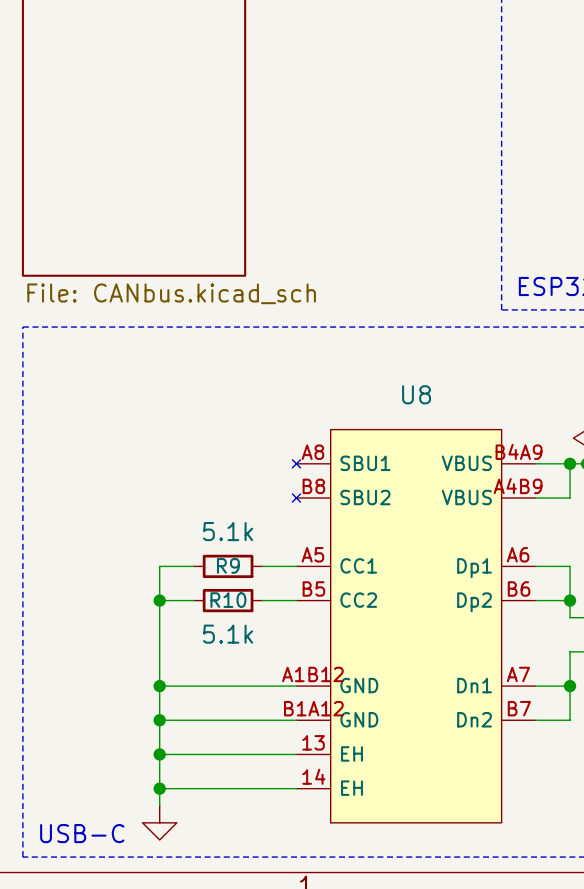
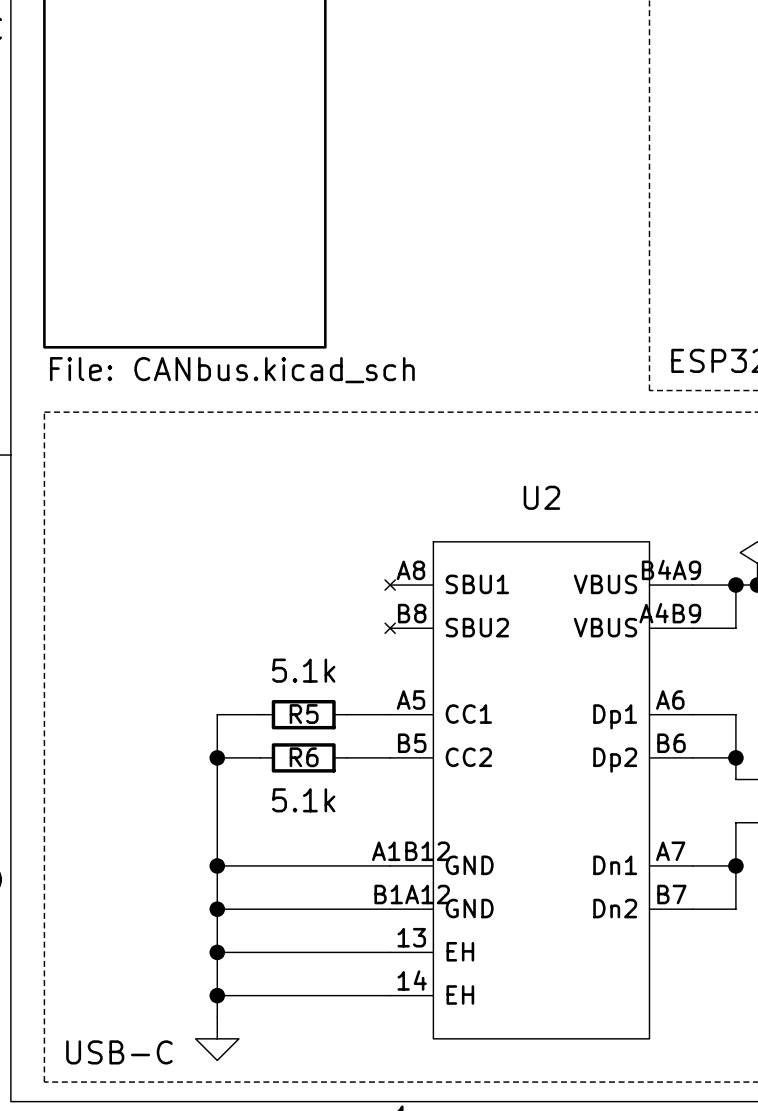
U8 name: U8 (416, 394) -> U2 (541, 497)
R9 name: R9 (228, 565) -> R5 (304, 714)
R10 name: R10 (228, 600) -> R6 (304, 757)

